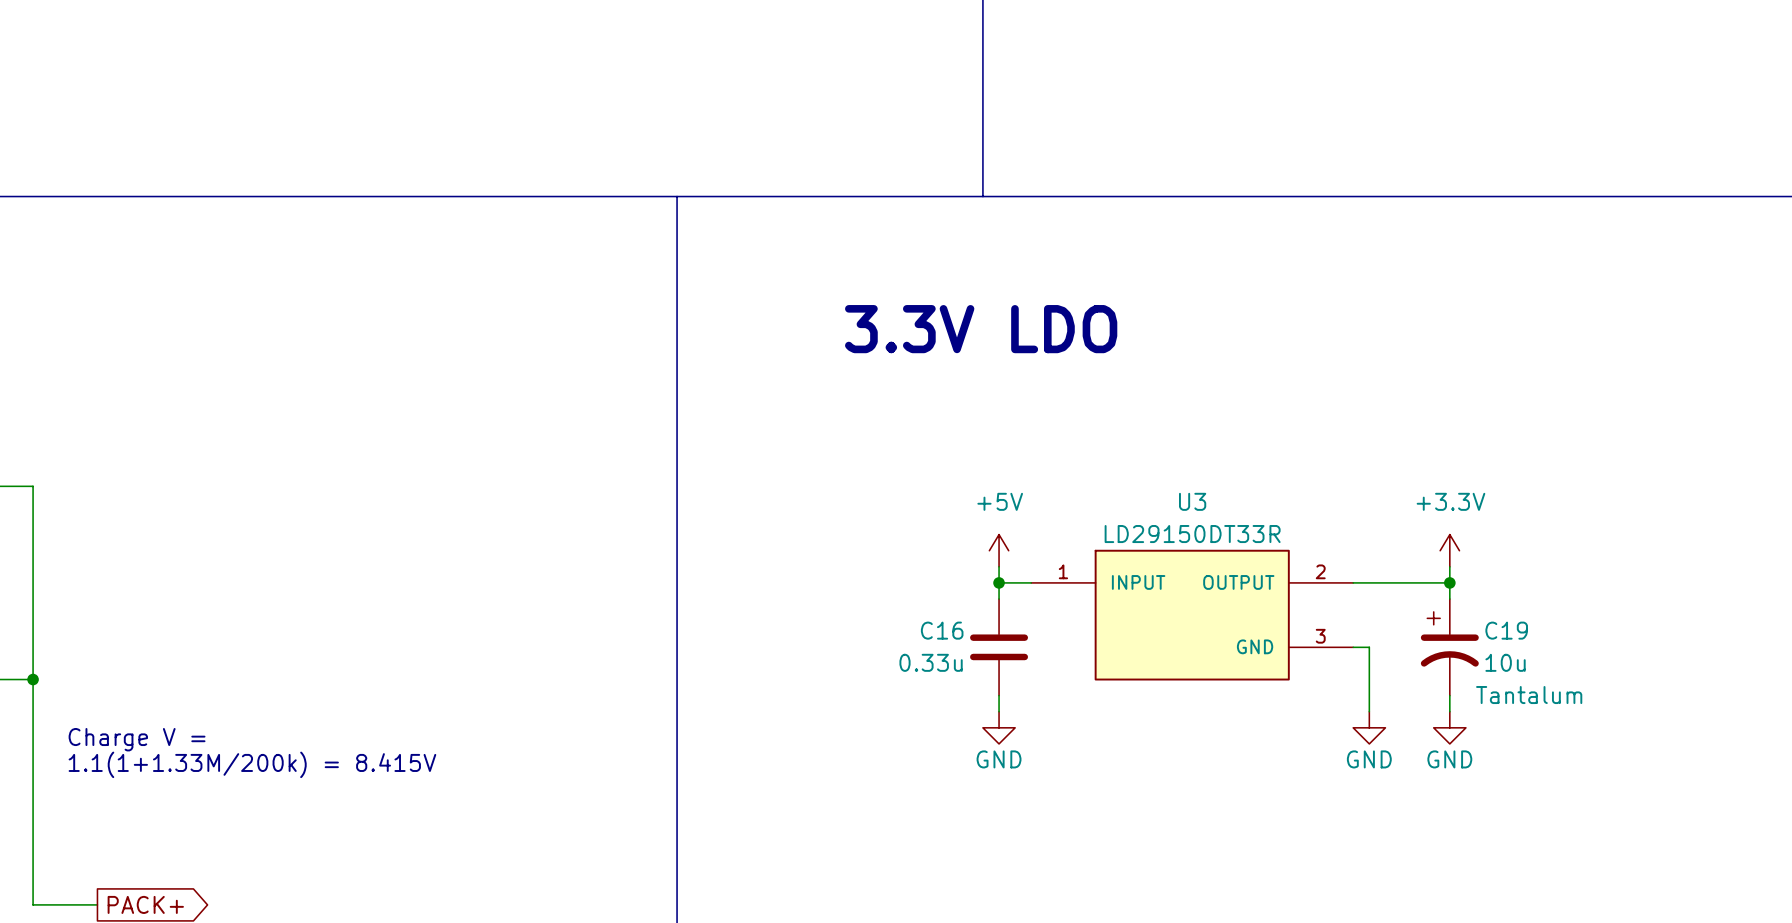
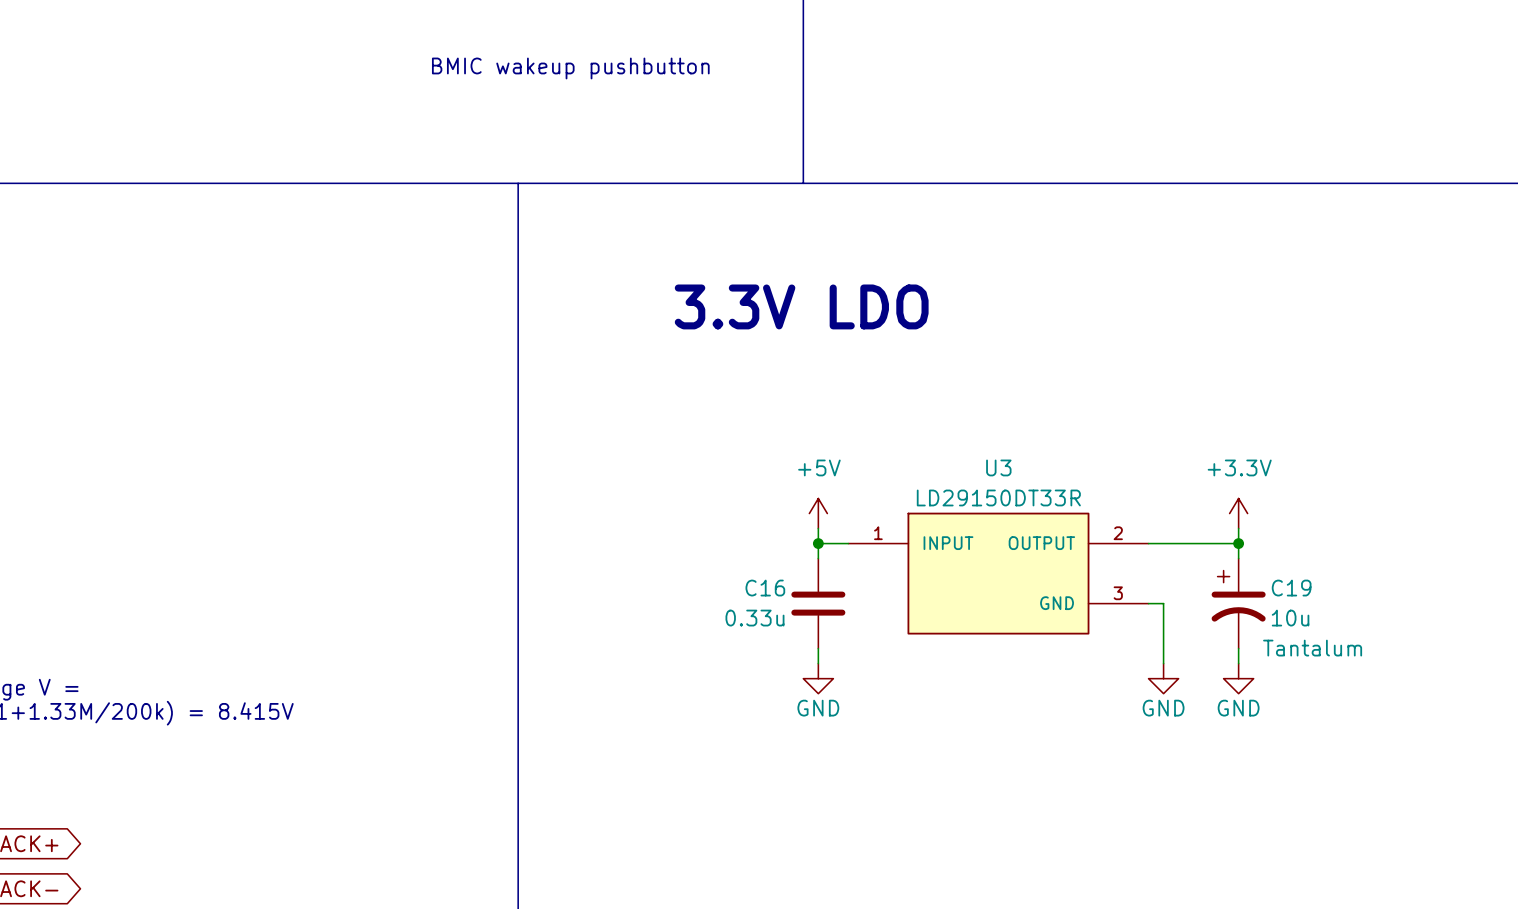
text: none -> BMIC wakeup pushbutton (570, 68)

